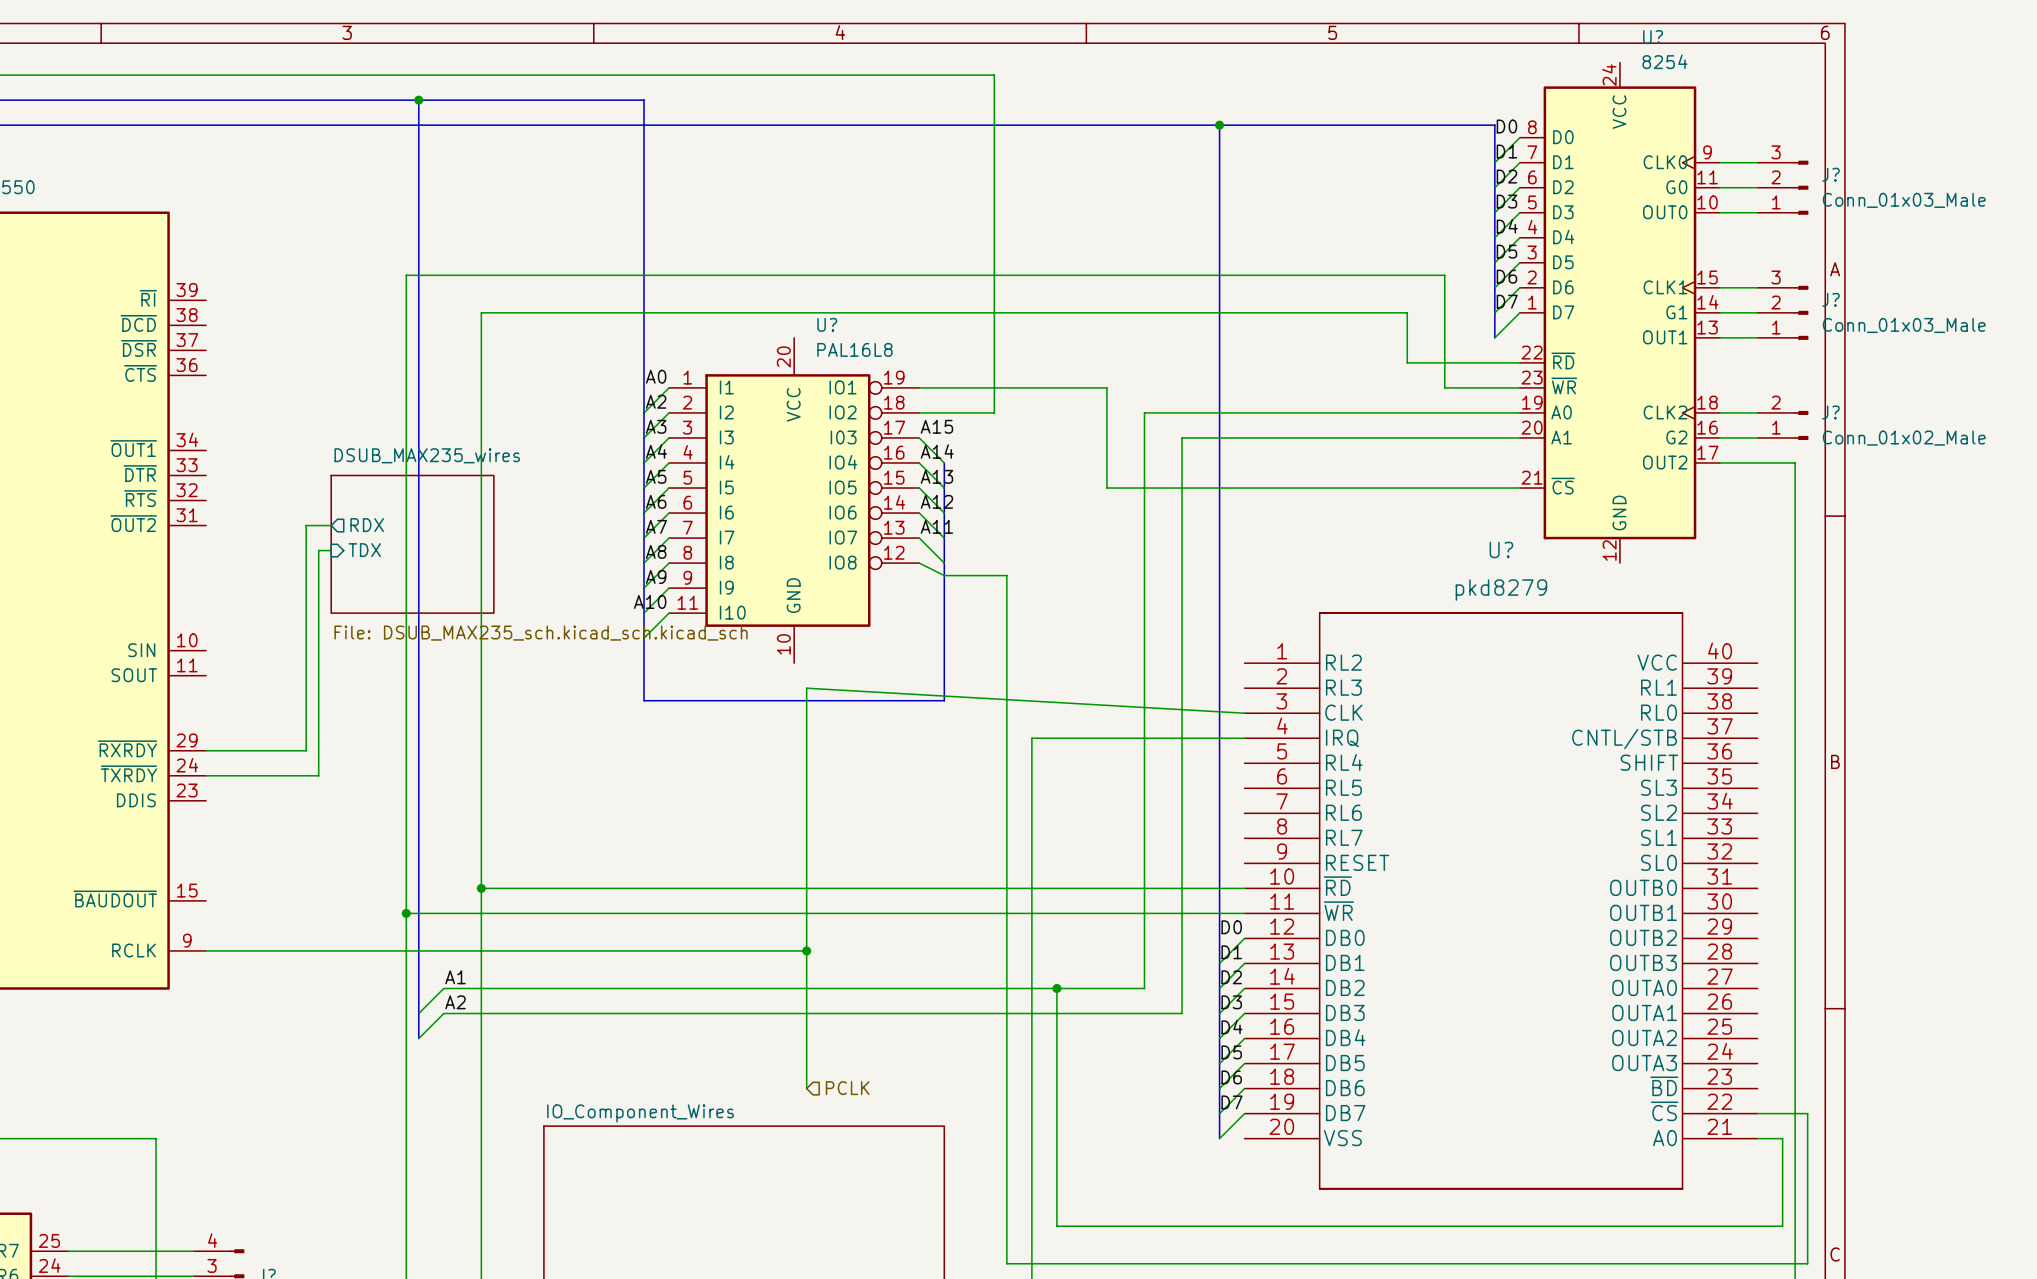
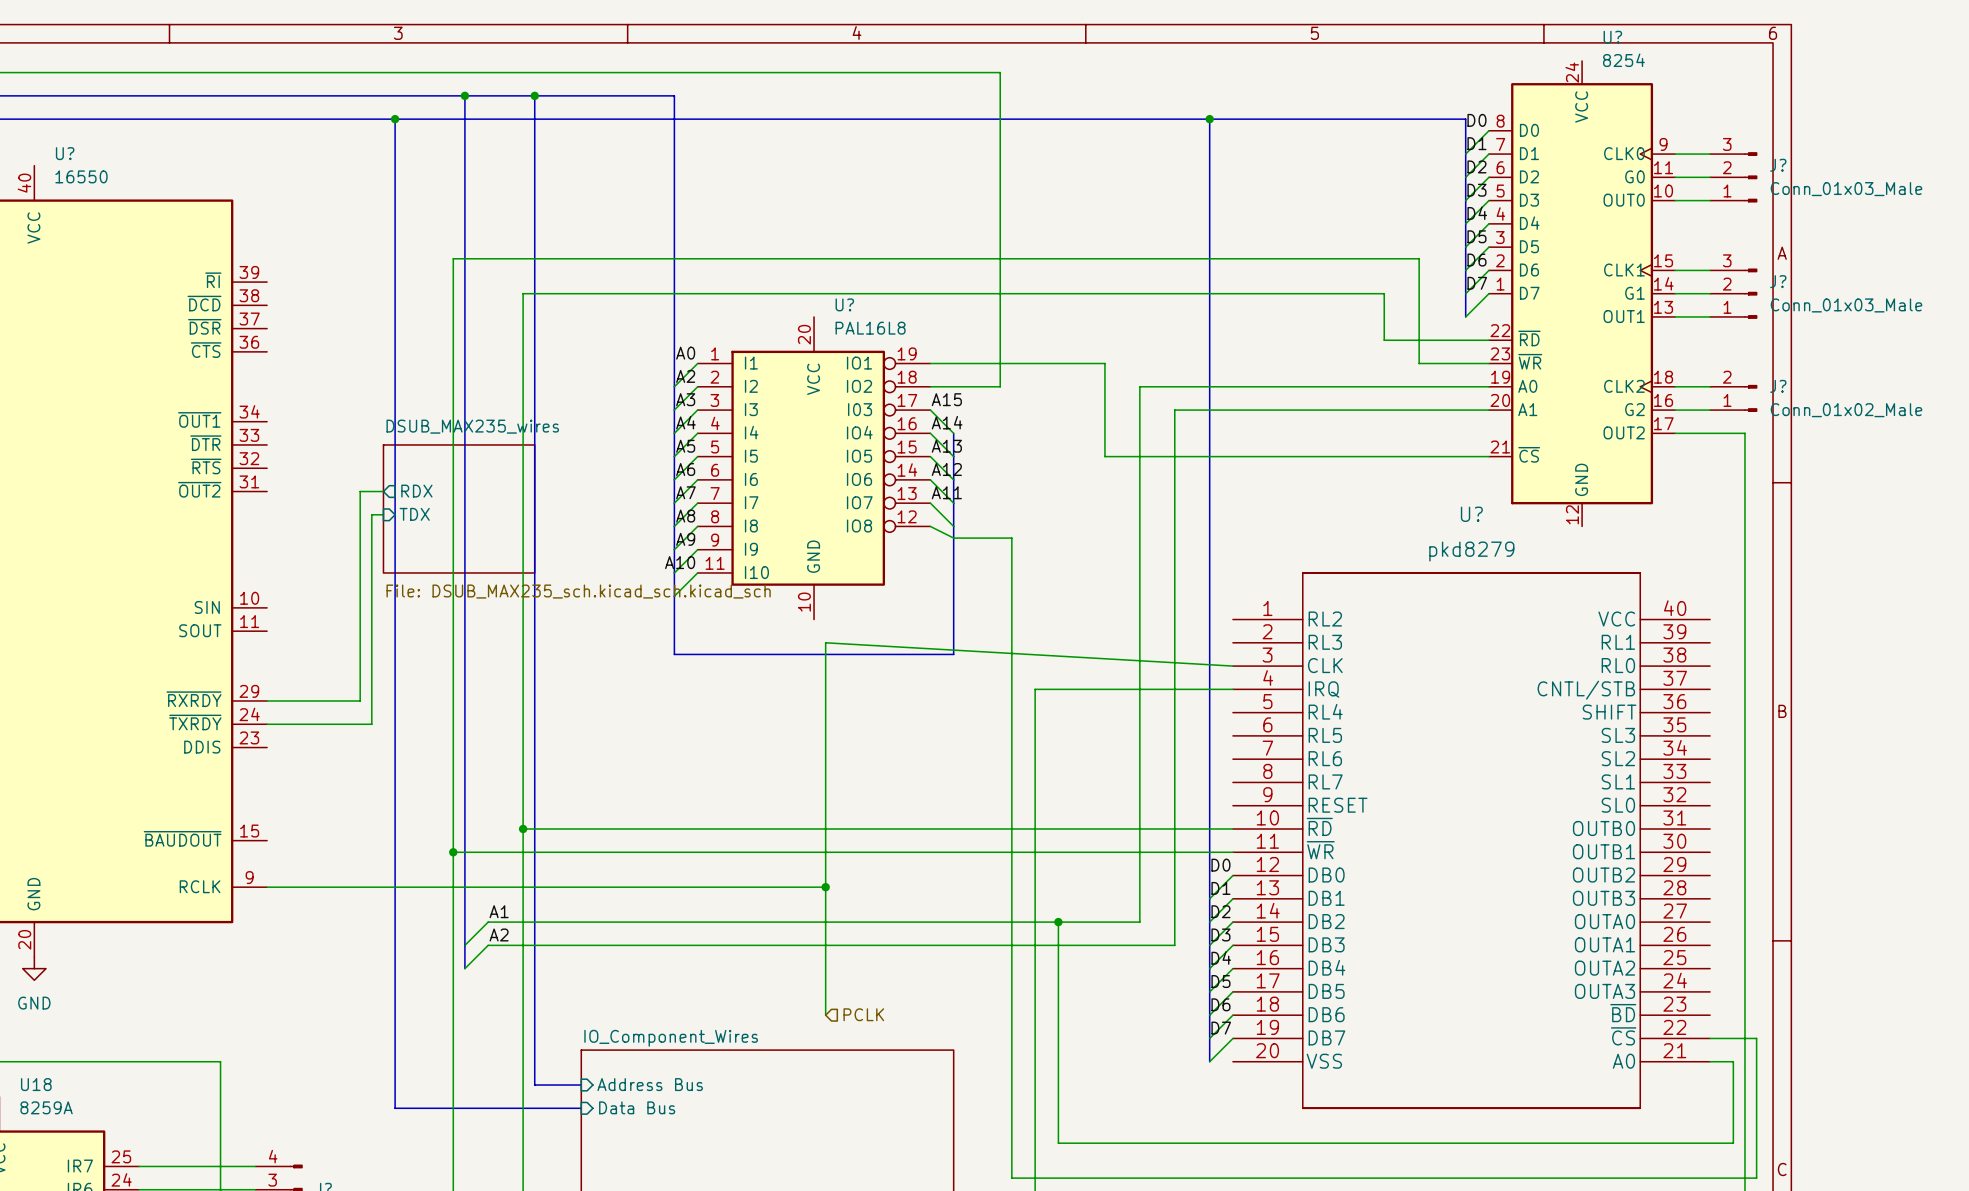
bus: none -> (534, 95) (534, 1085) (581, 1085)
junction: none -> (534, 95)
bus: none -> (395, 119) (395, 1108) (581, 1108)
junction: none -> (395, 119)
sheet pin: none -> Address Bus (650, 1084)
sheet pin: none -> Data Bus (637, 1107)

